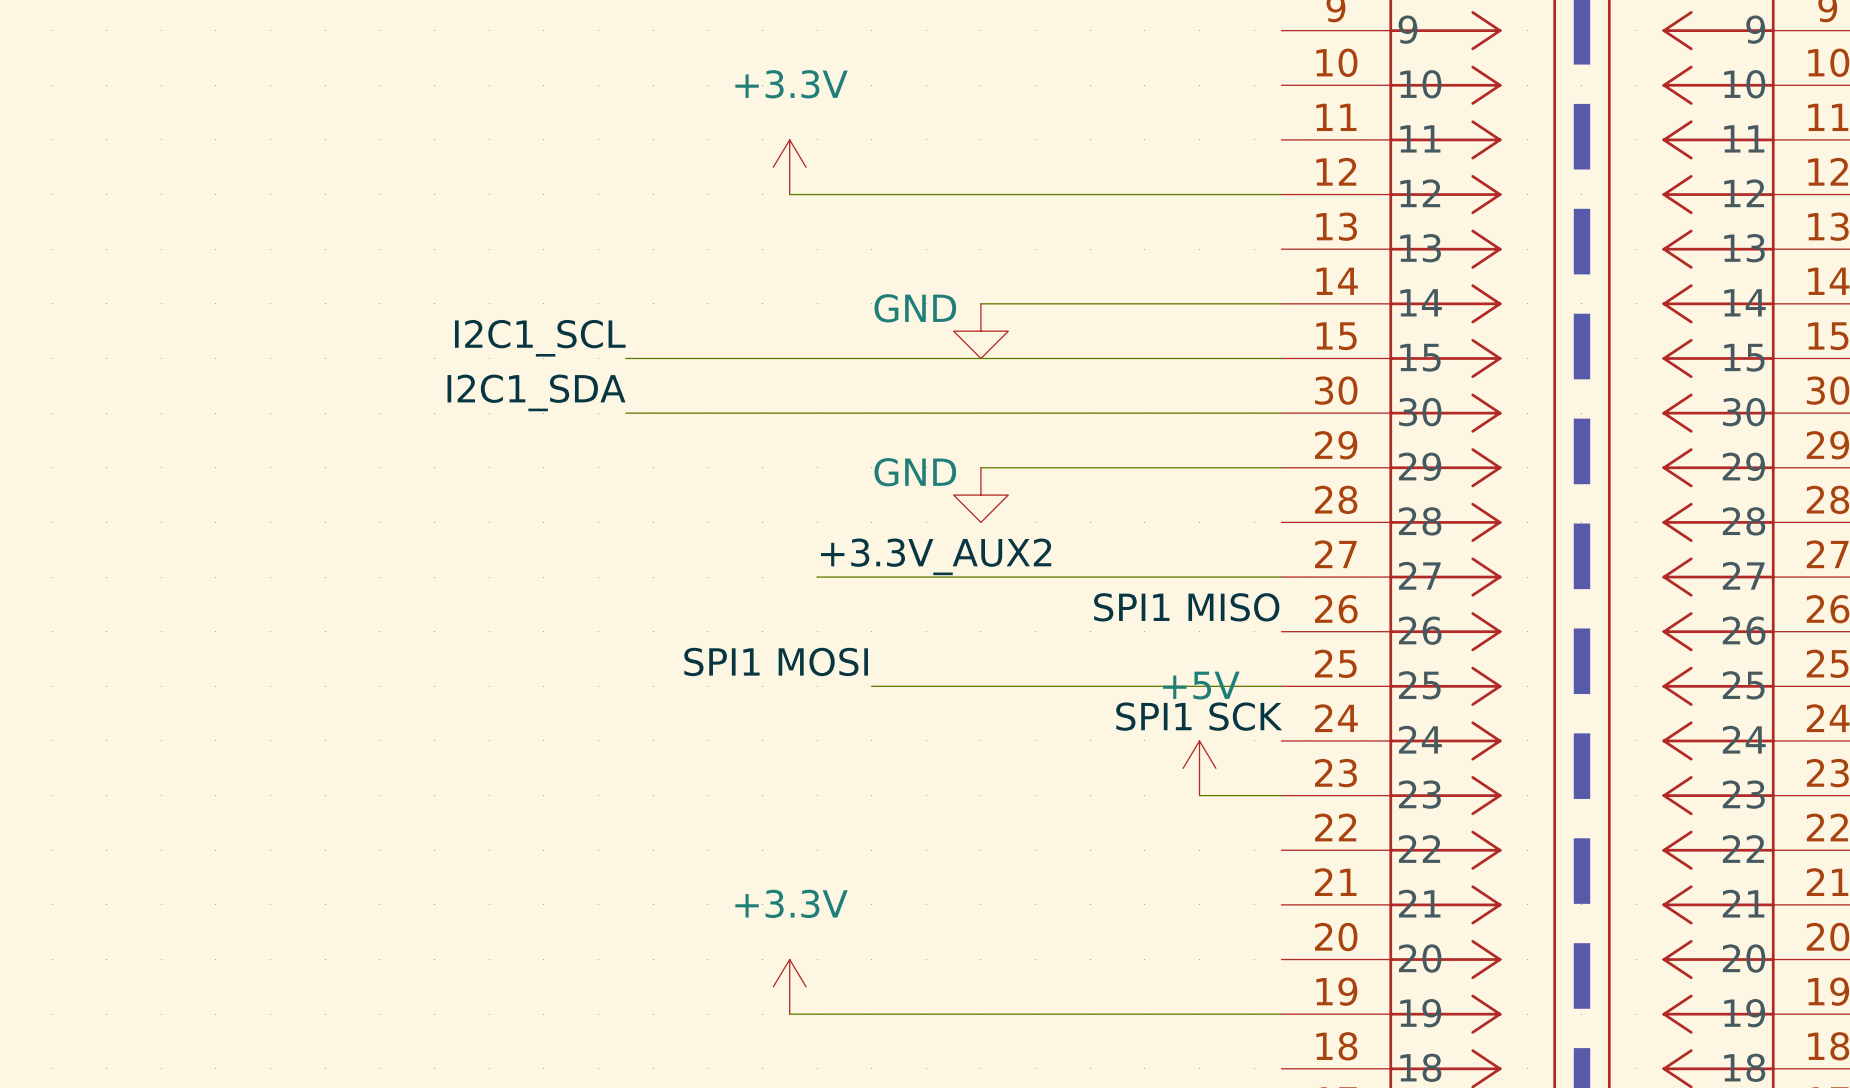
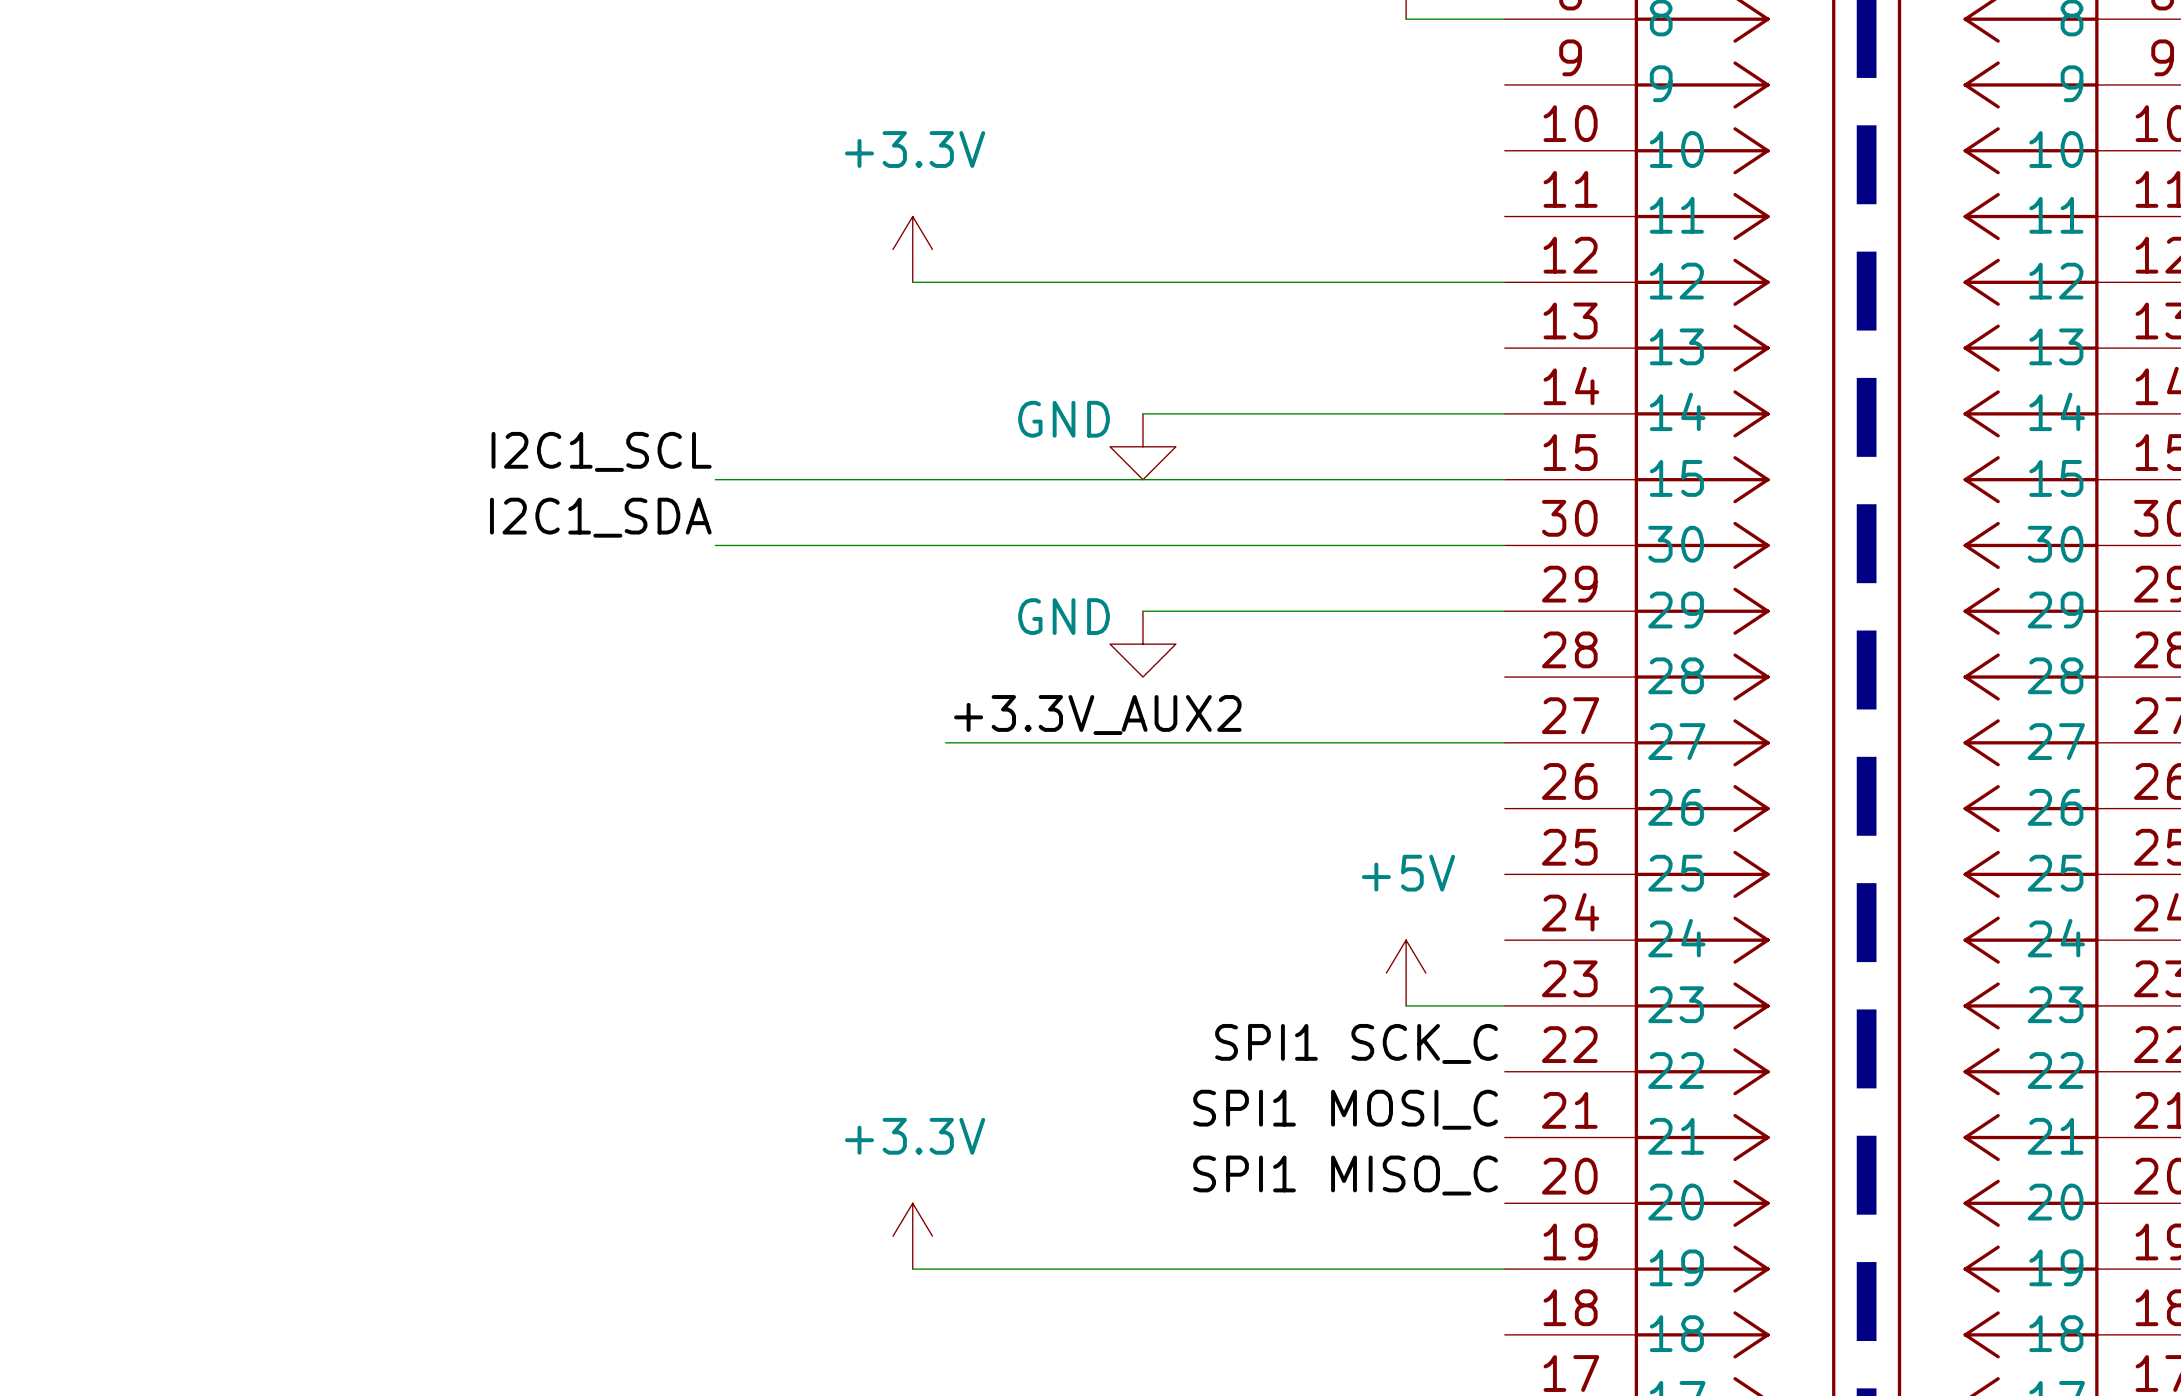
label: SPI1 MISO (1186, 607) -> none
label: SPI1 MOSI (776, 661) -> none
wire: (871, 686) (1281, 686) -> none
label: SPI1 SCK (1199, 716) -> none
label: none -> SPI1 SCK_C (1356, 1043)
label: none -> SPI1 MOSI_C (1345, 1109)
label: none -> SPI1 MISO_C (1345, 1175)

